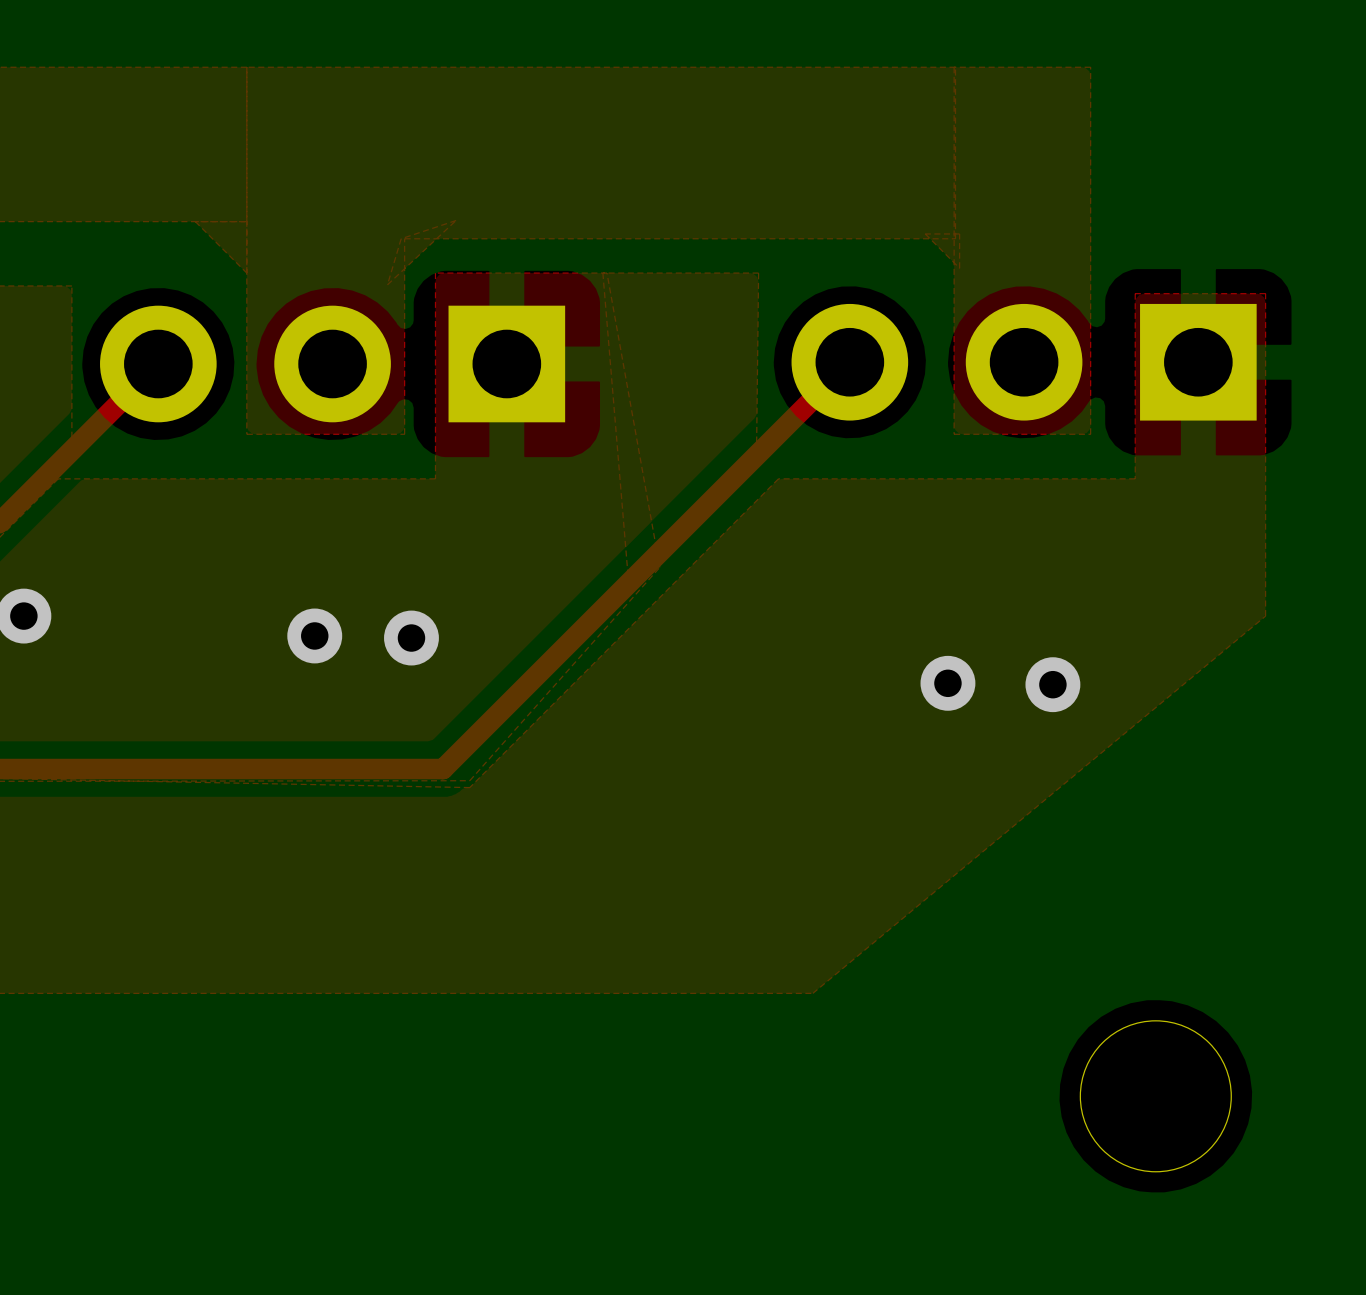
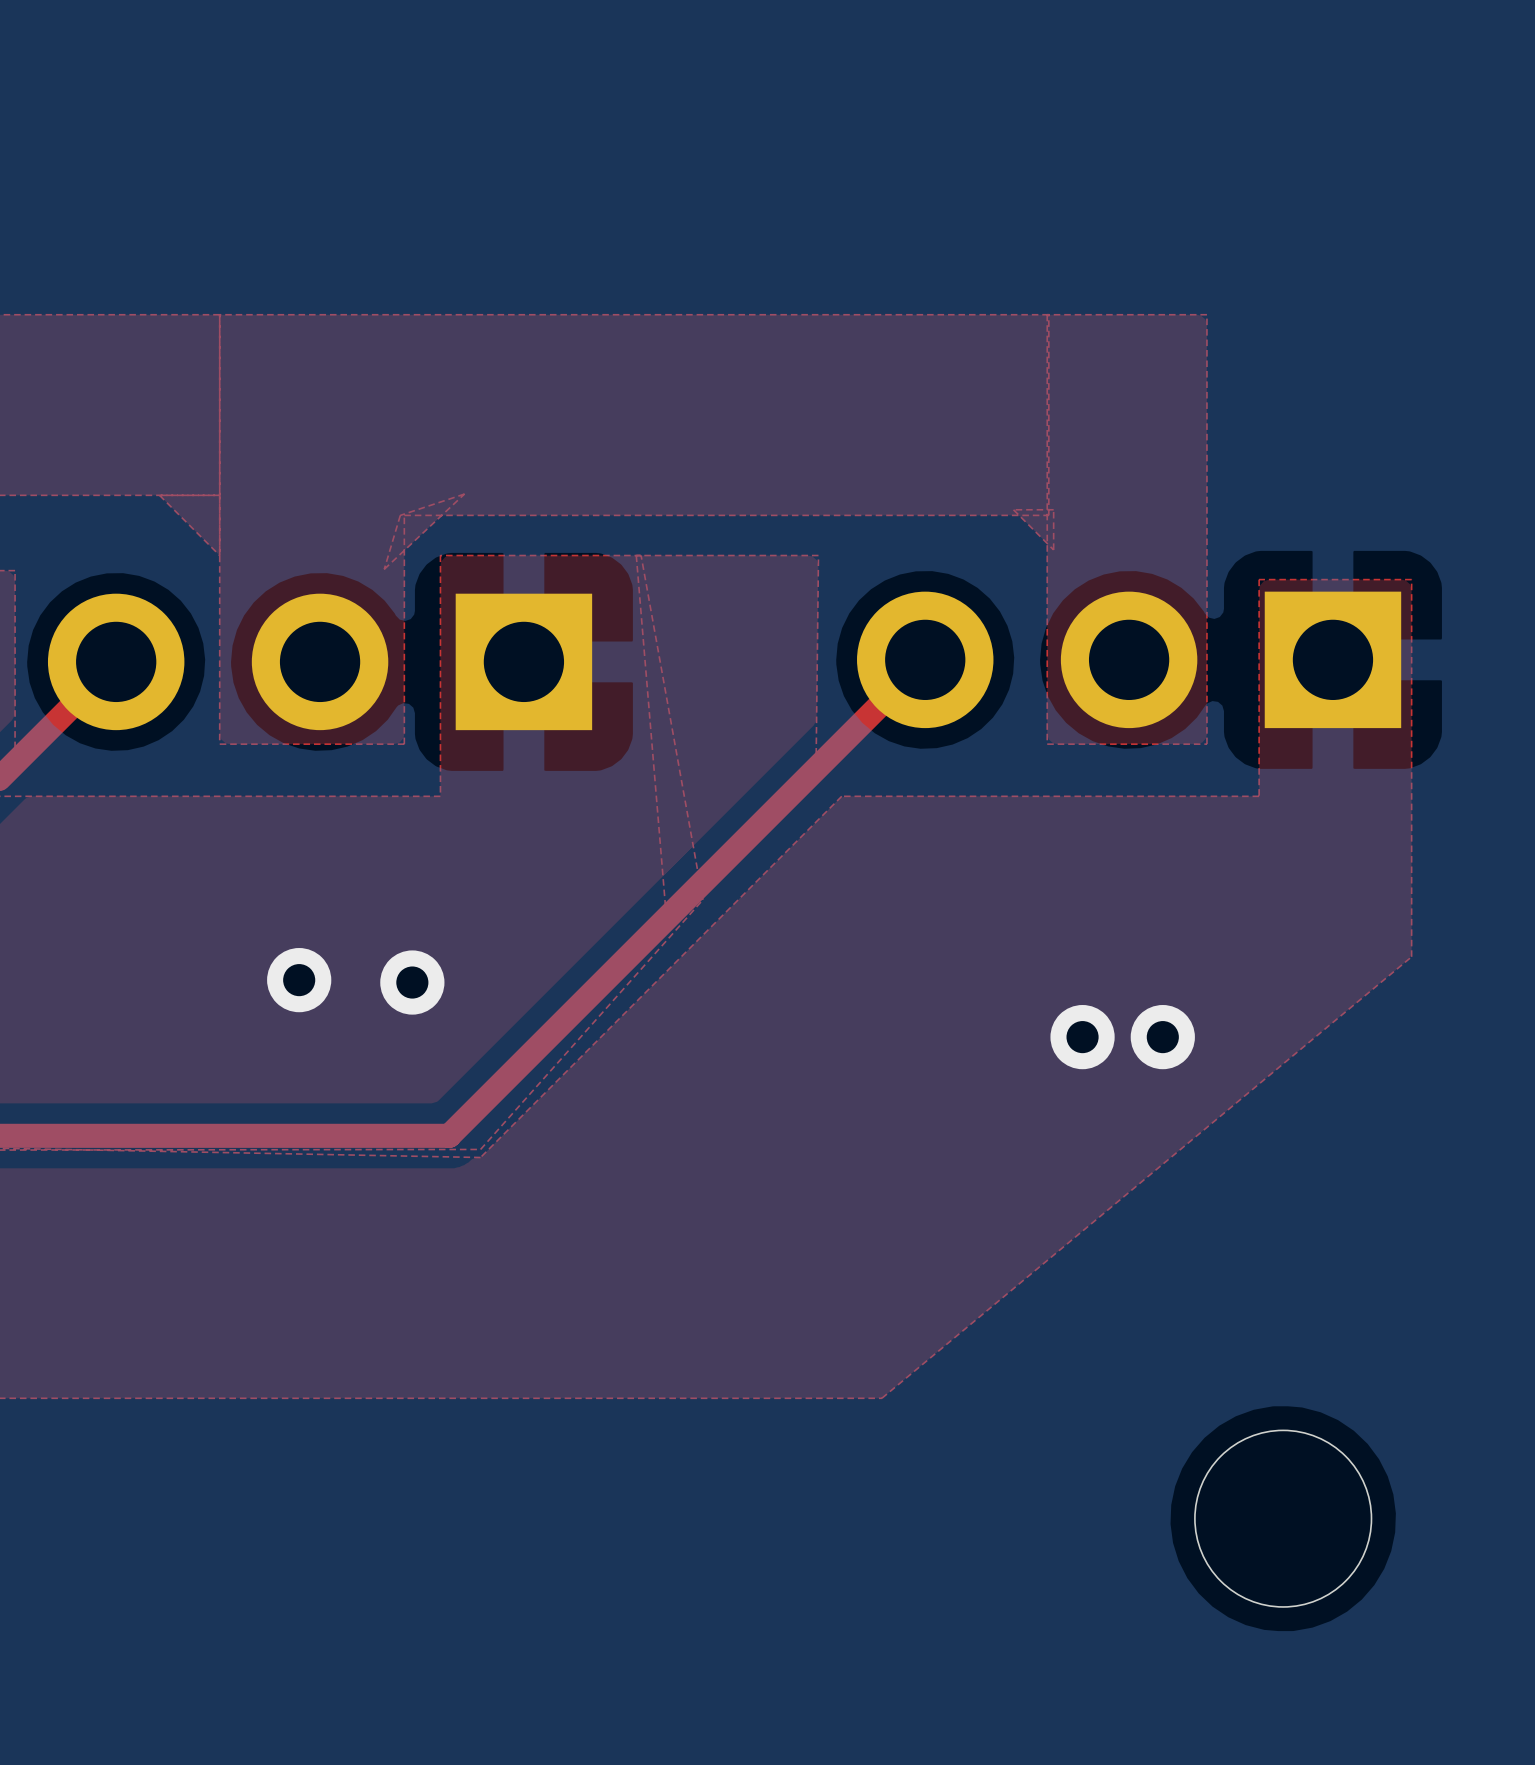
via position: (947, 683) -> (1082, 1037)

